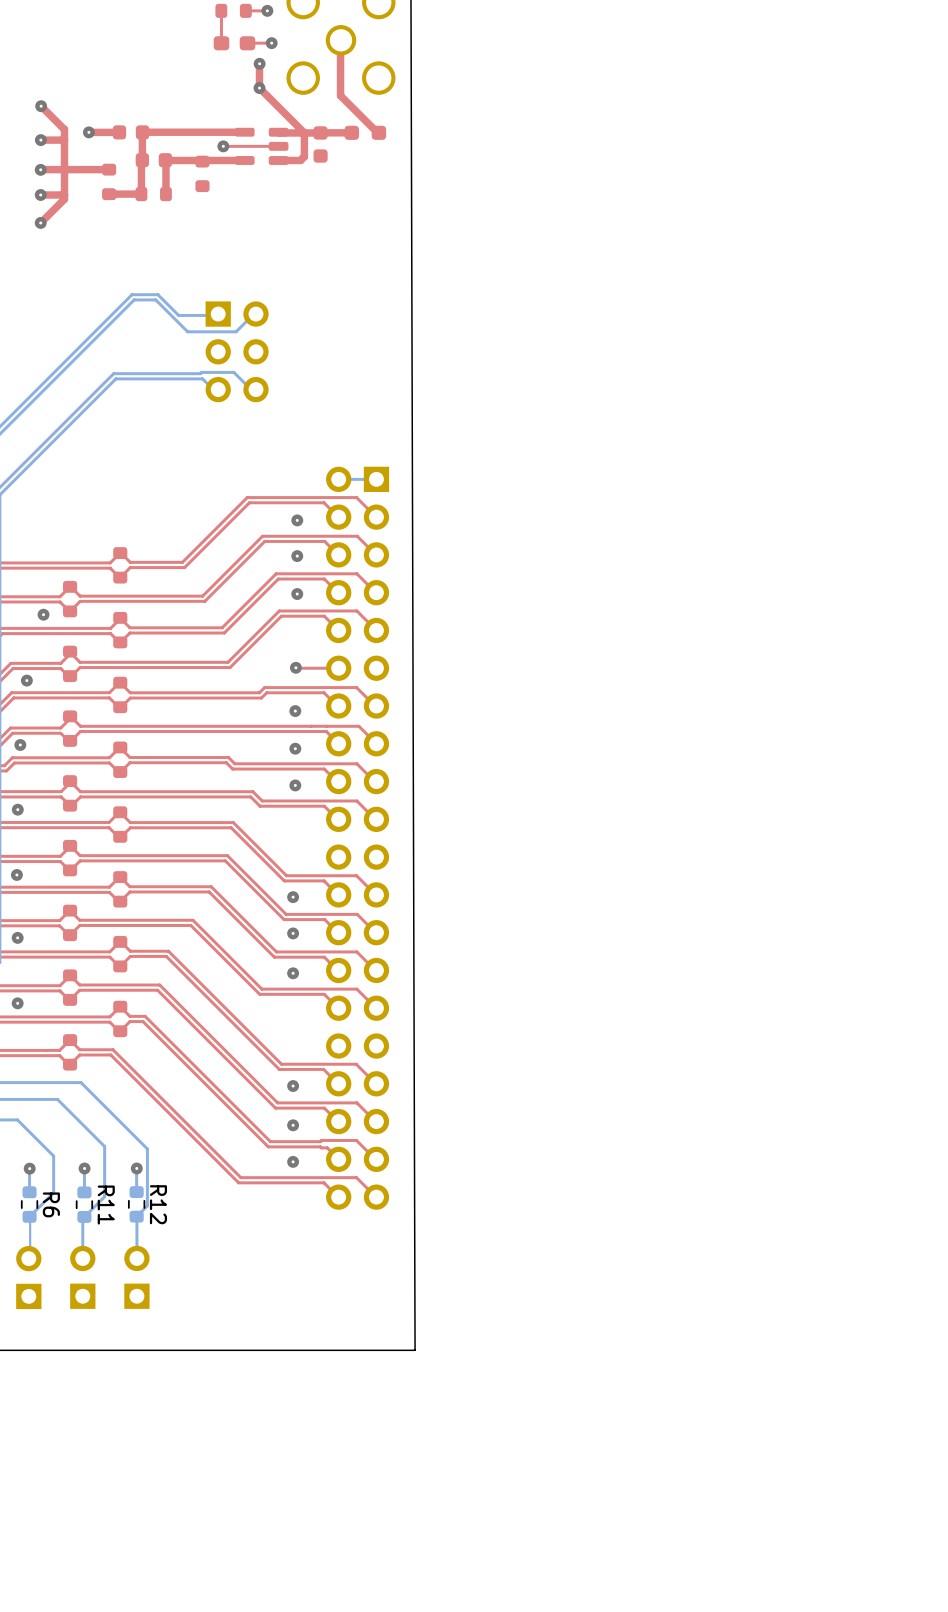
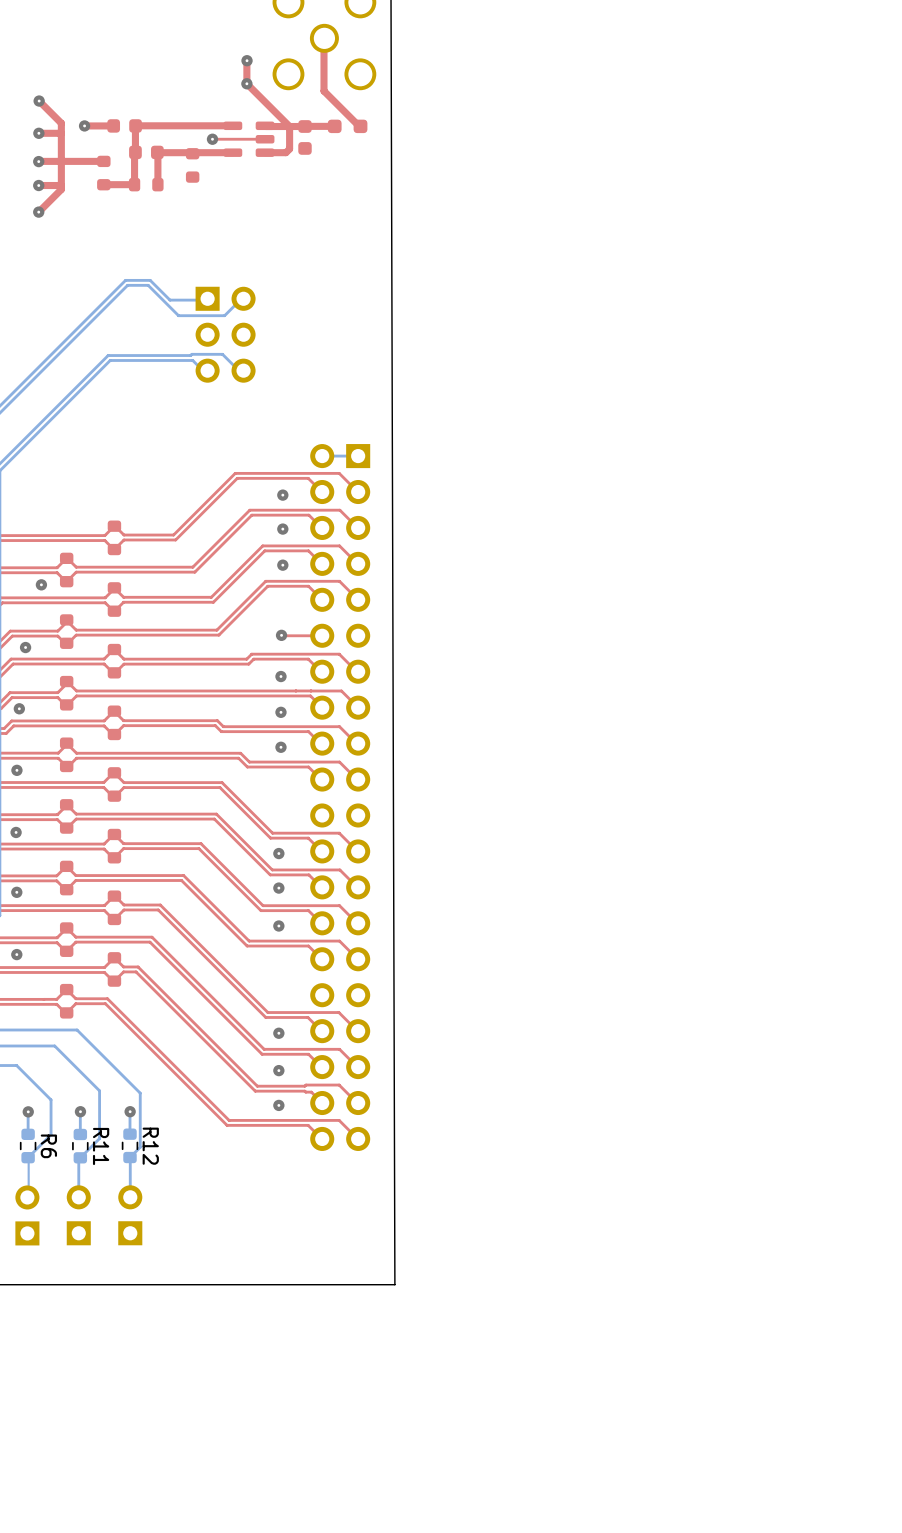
part: (233, 10) -> none
top track: (267, 10) (245, 10) -> none
via: (267, 10) -> none
top track: (221, 11) (221, 43) -> none
part: (234, 43) -> none
top track: (271, 43) (247, 43) -> none
via: (271, 43) -> none

